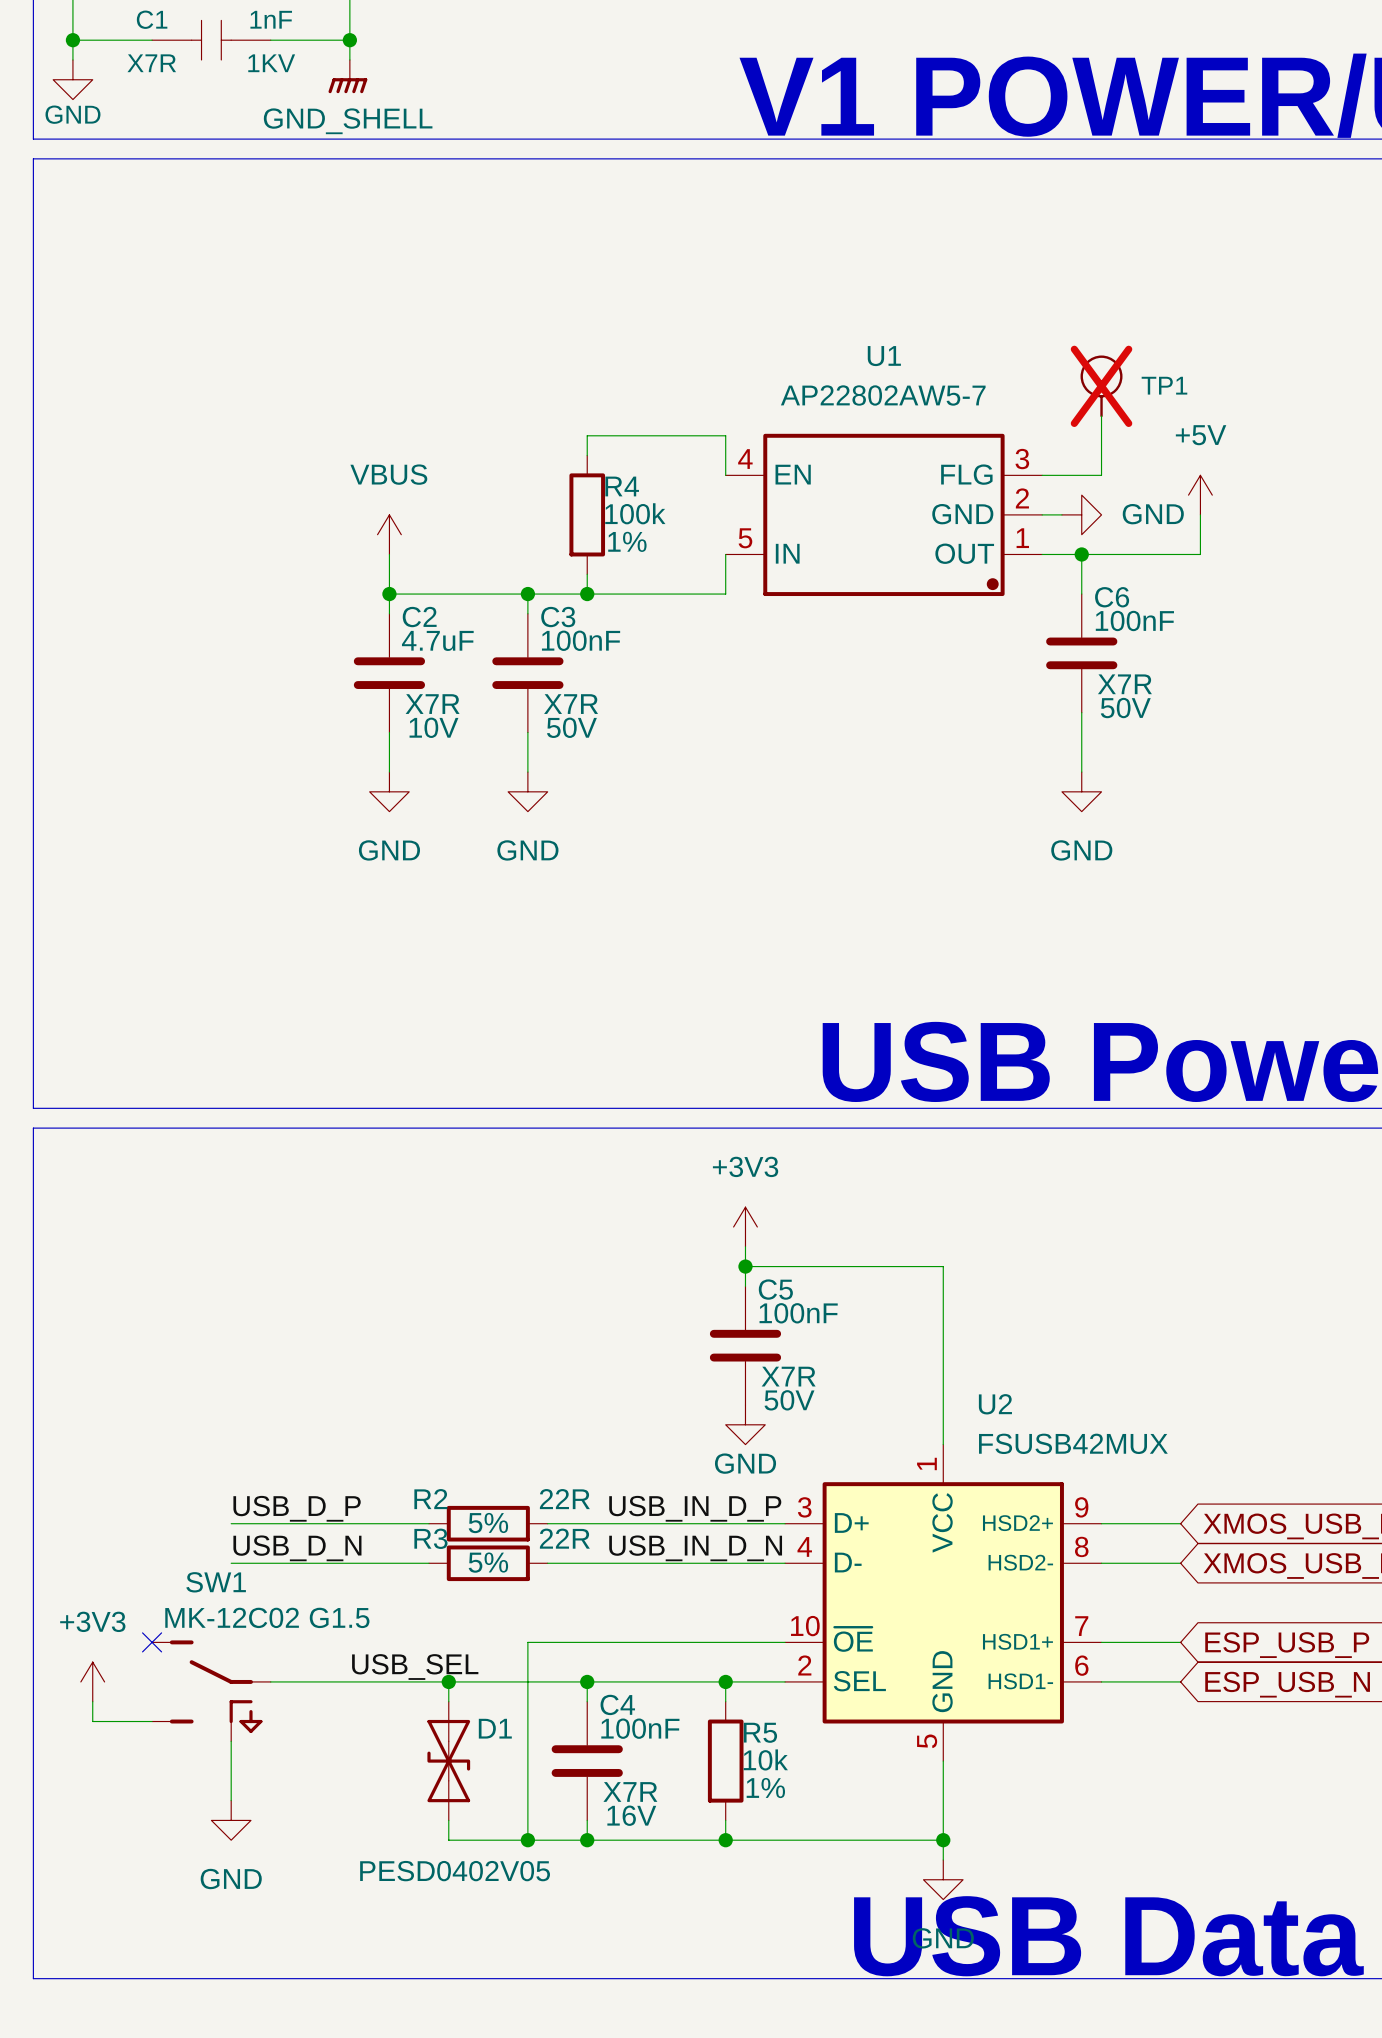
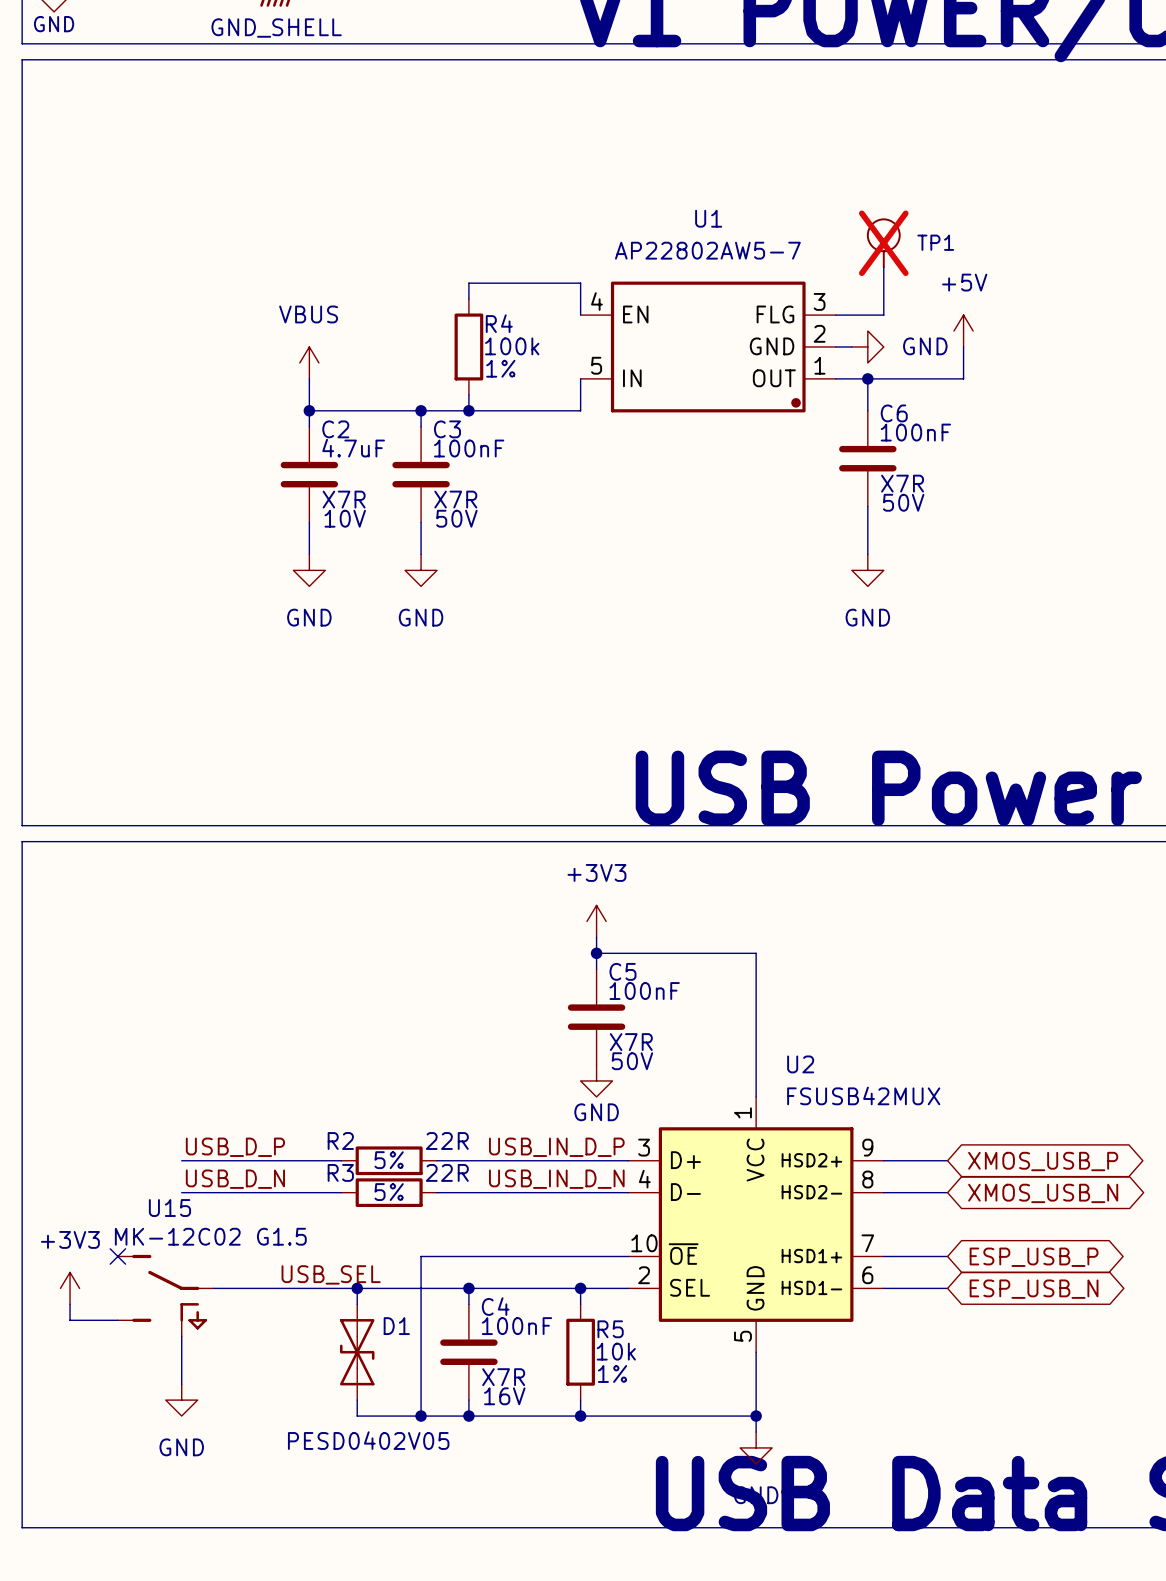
SW1 name: SW1 (216, 1582) -> U15 (169, 1208)

